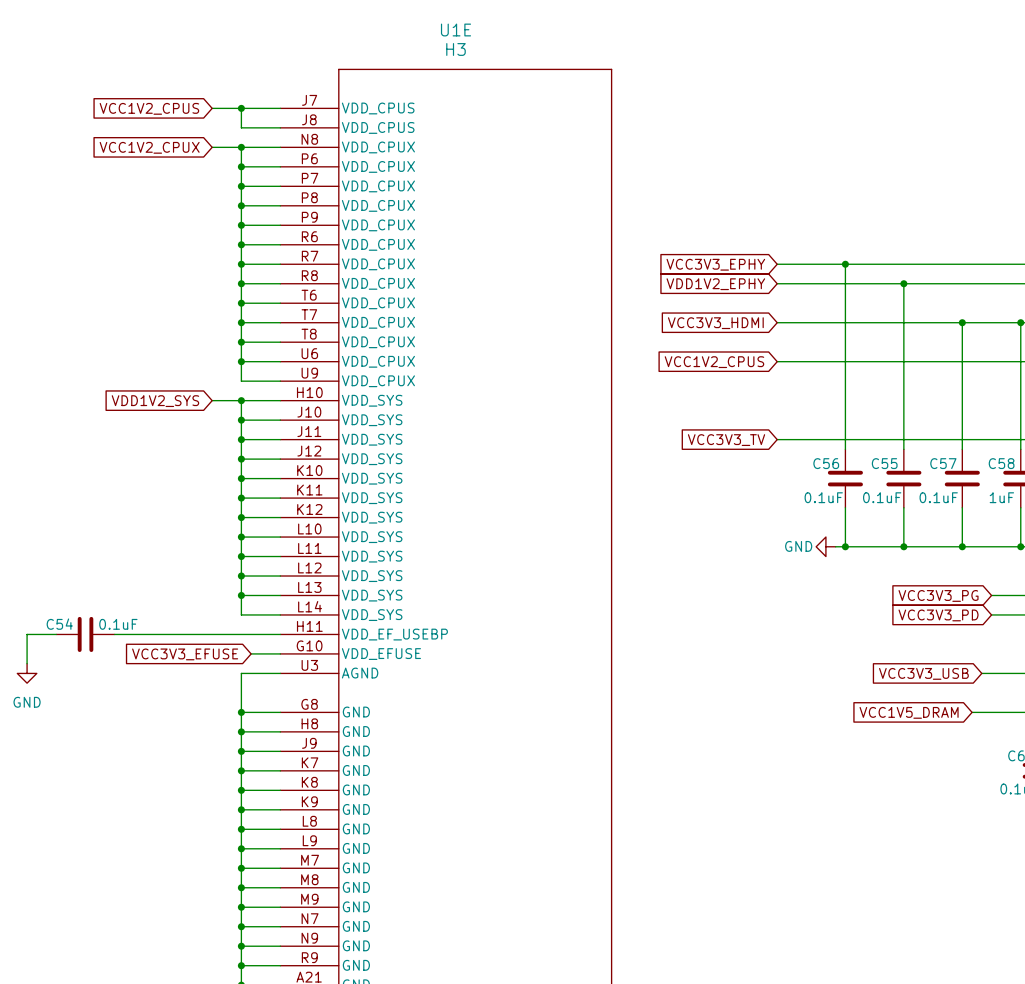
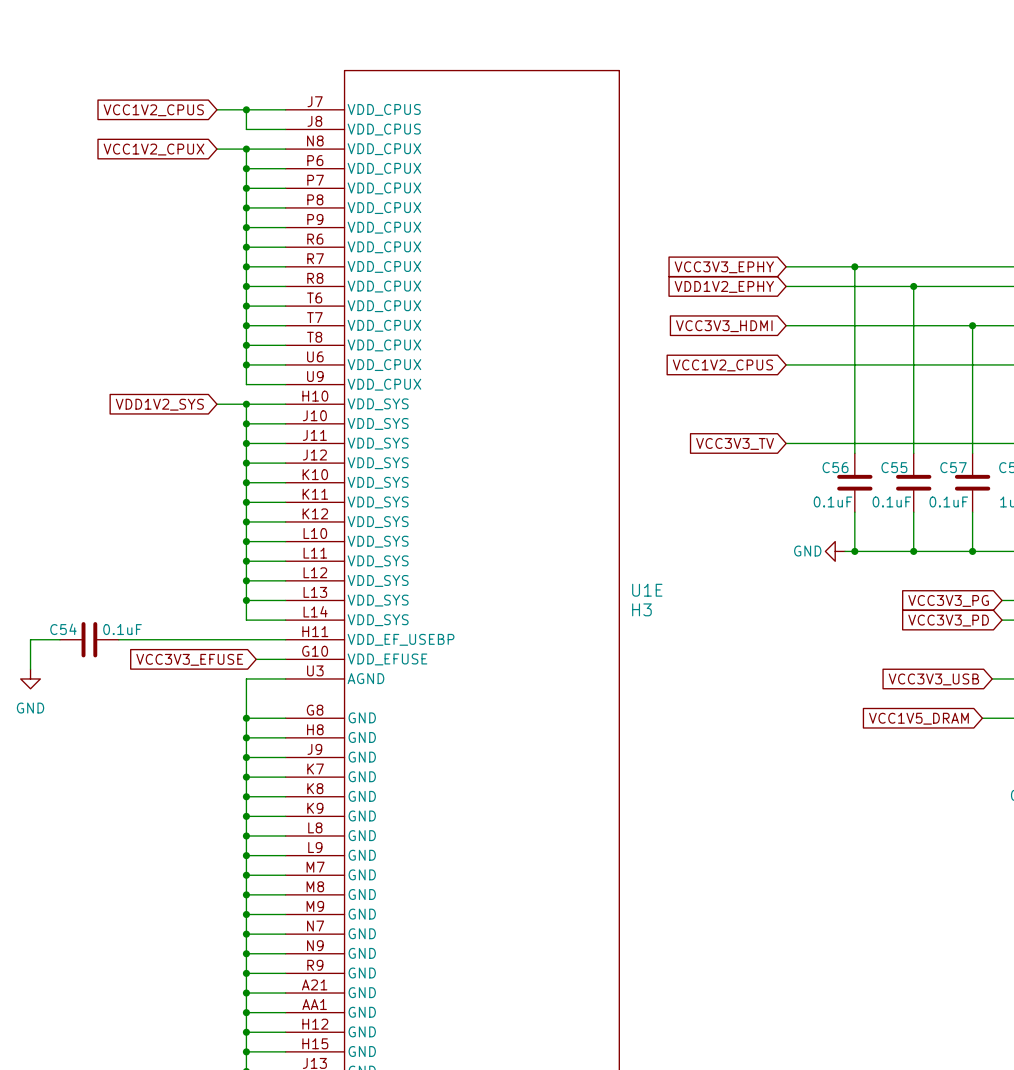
U1E name position: U1E (456, 30) -> U1E (647, 590)
U1E value position: H3 (456, 49) -> H3 (641, 609)

